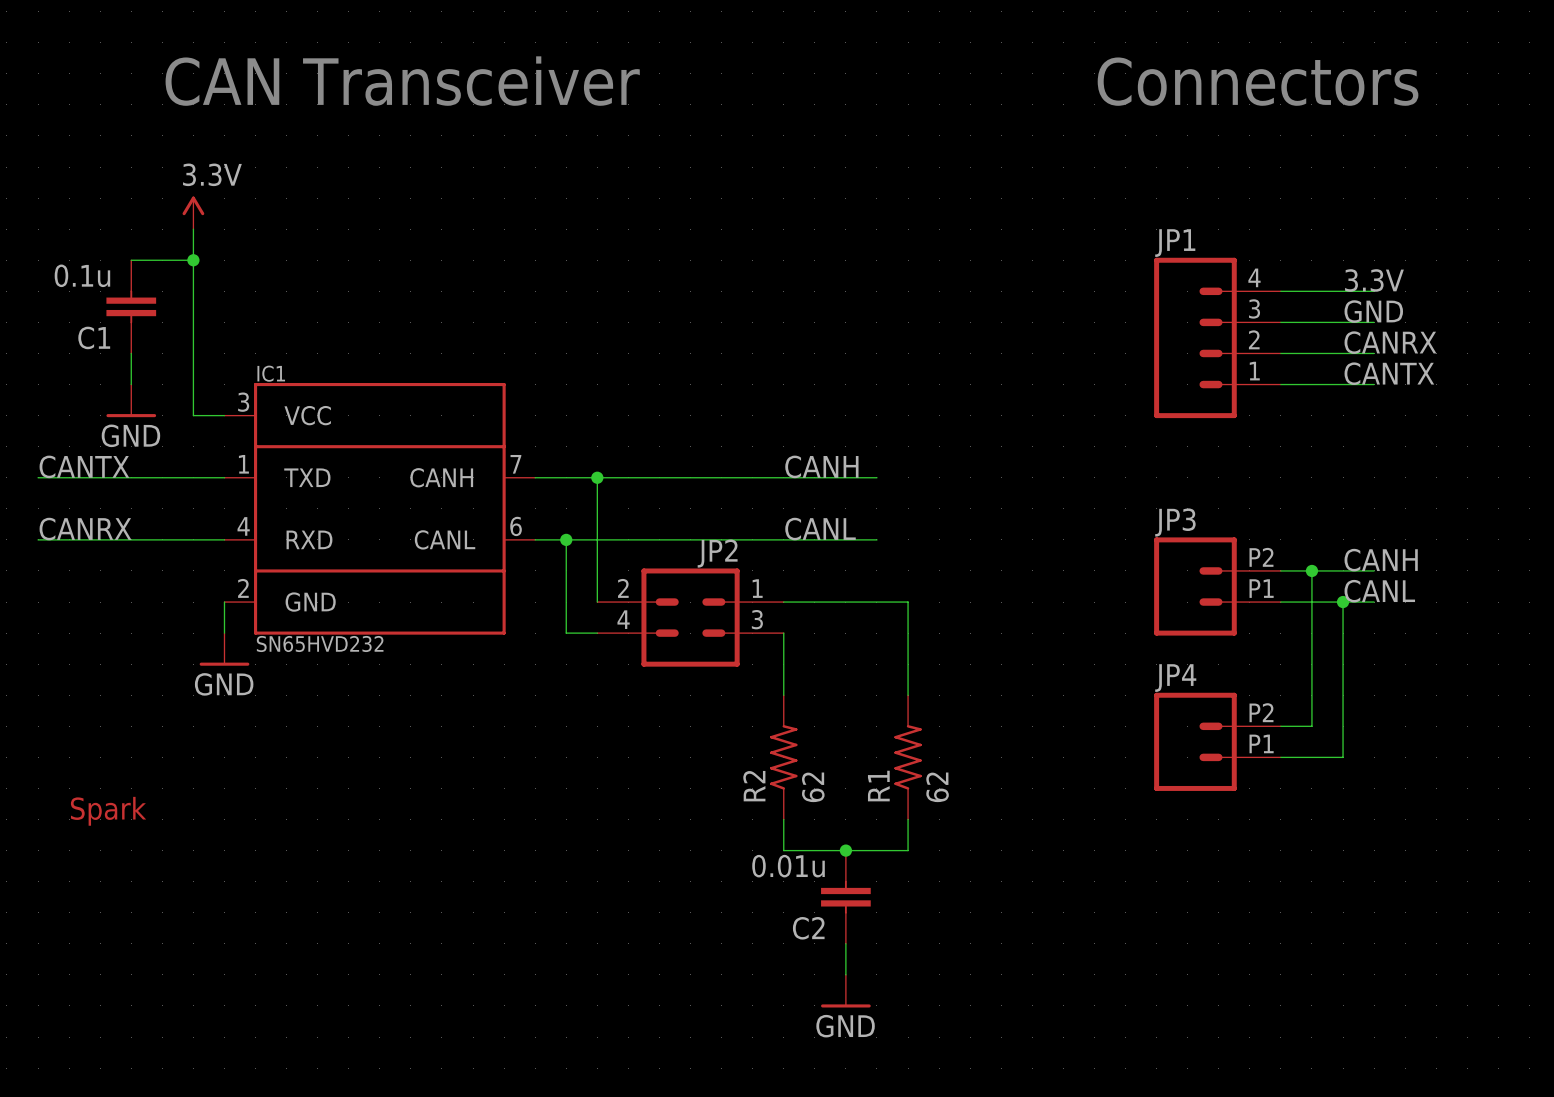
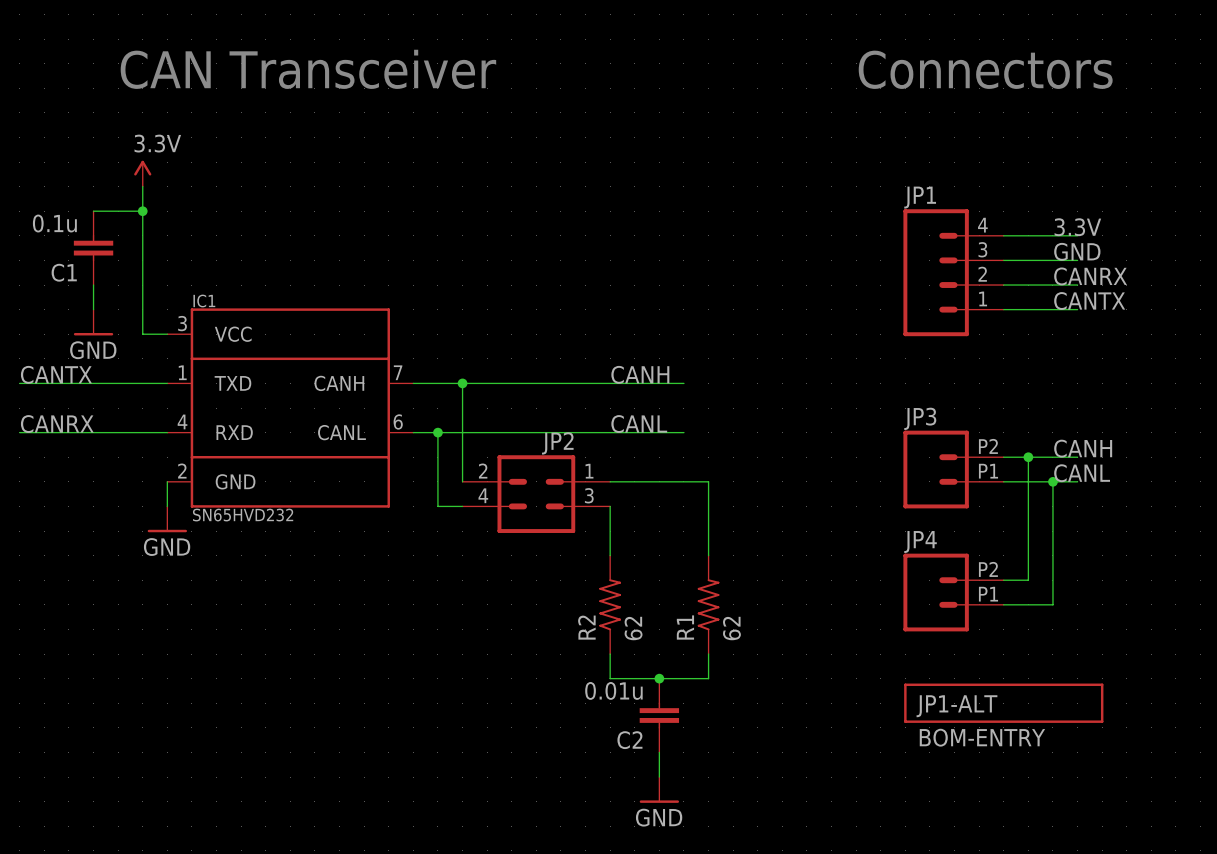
part: (108, 811) -> none
JP1-ALT: none -> BOM-ENTRY (1003, 703)

